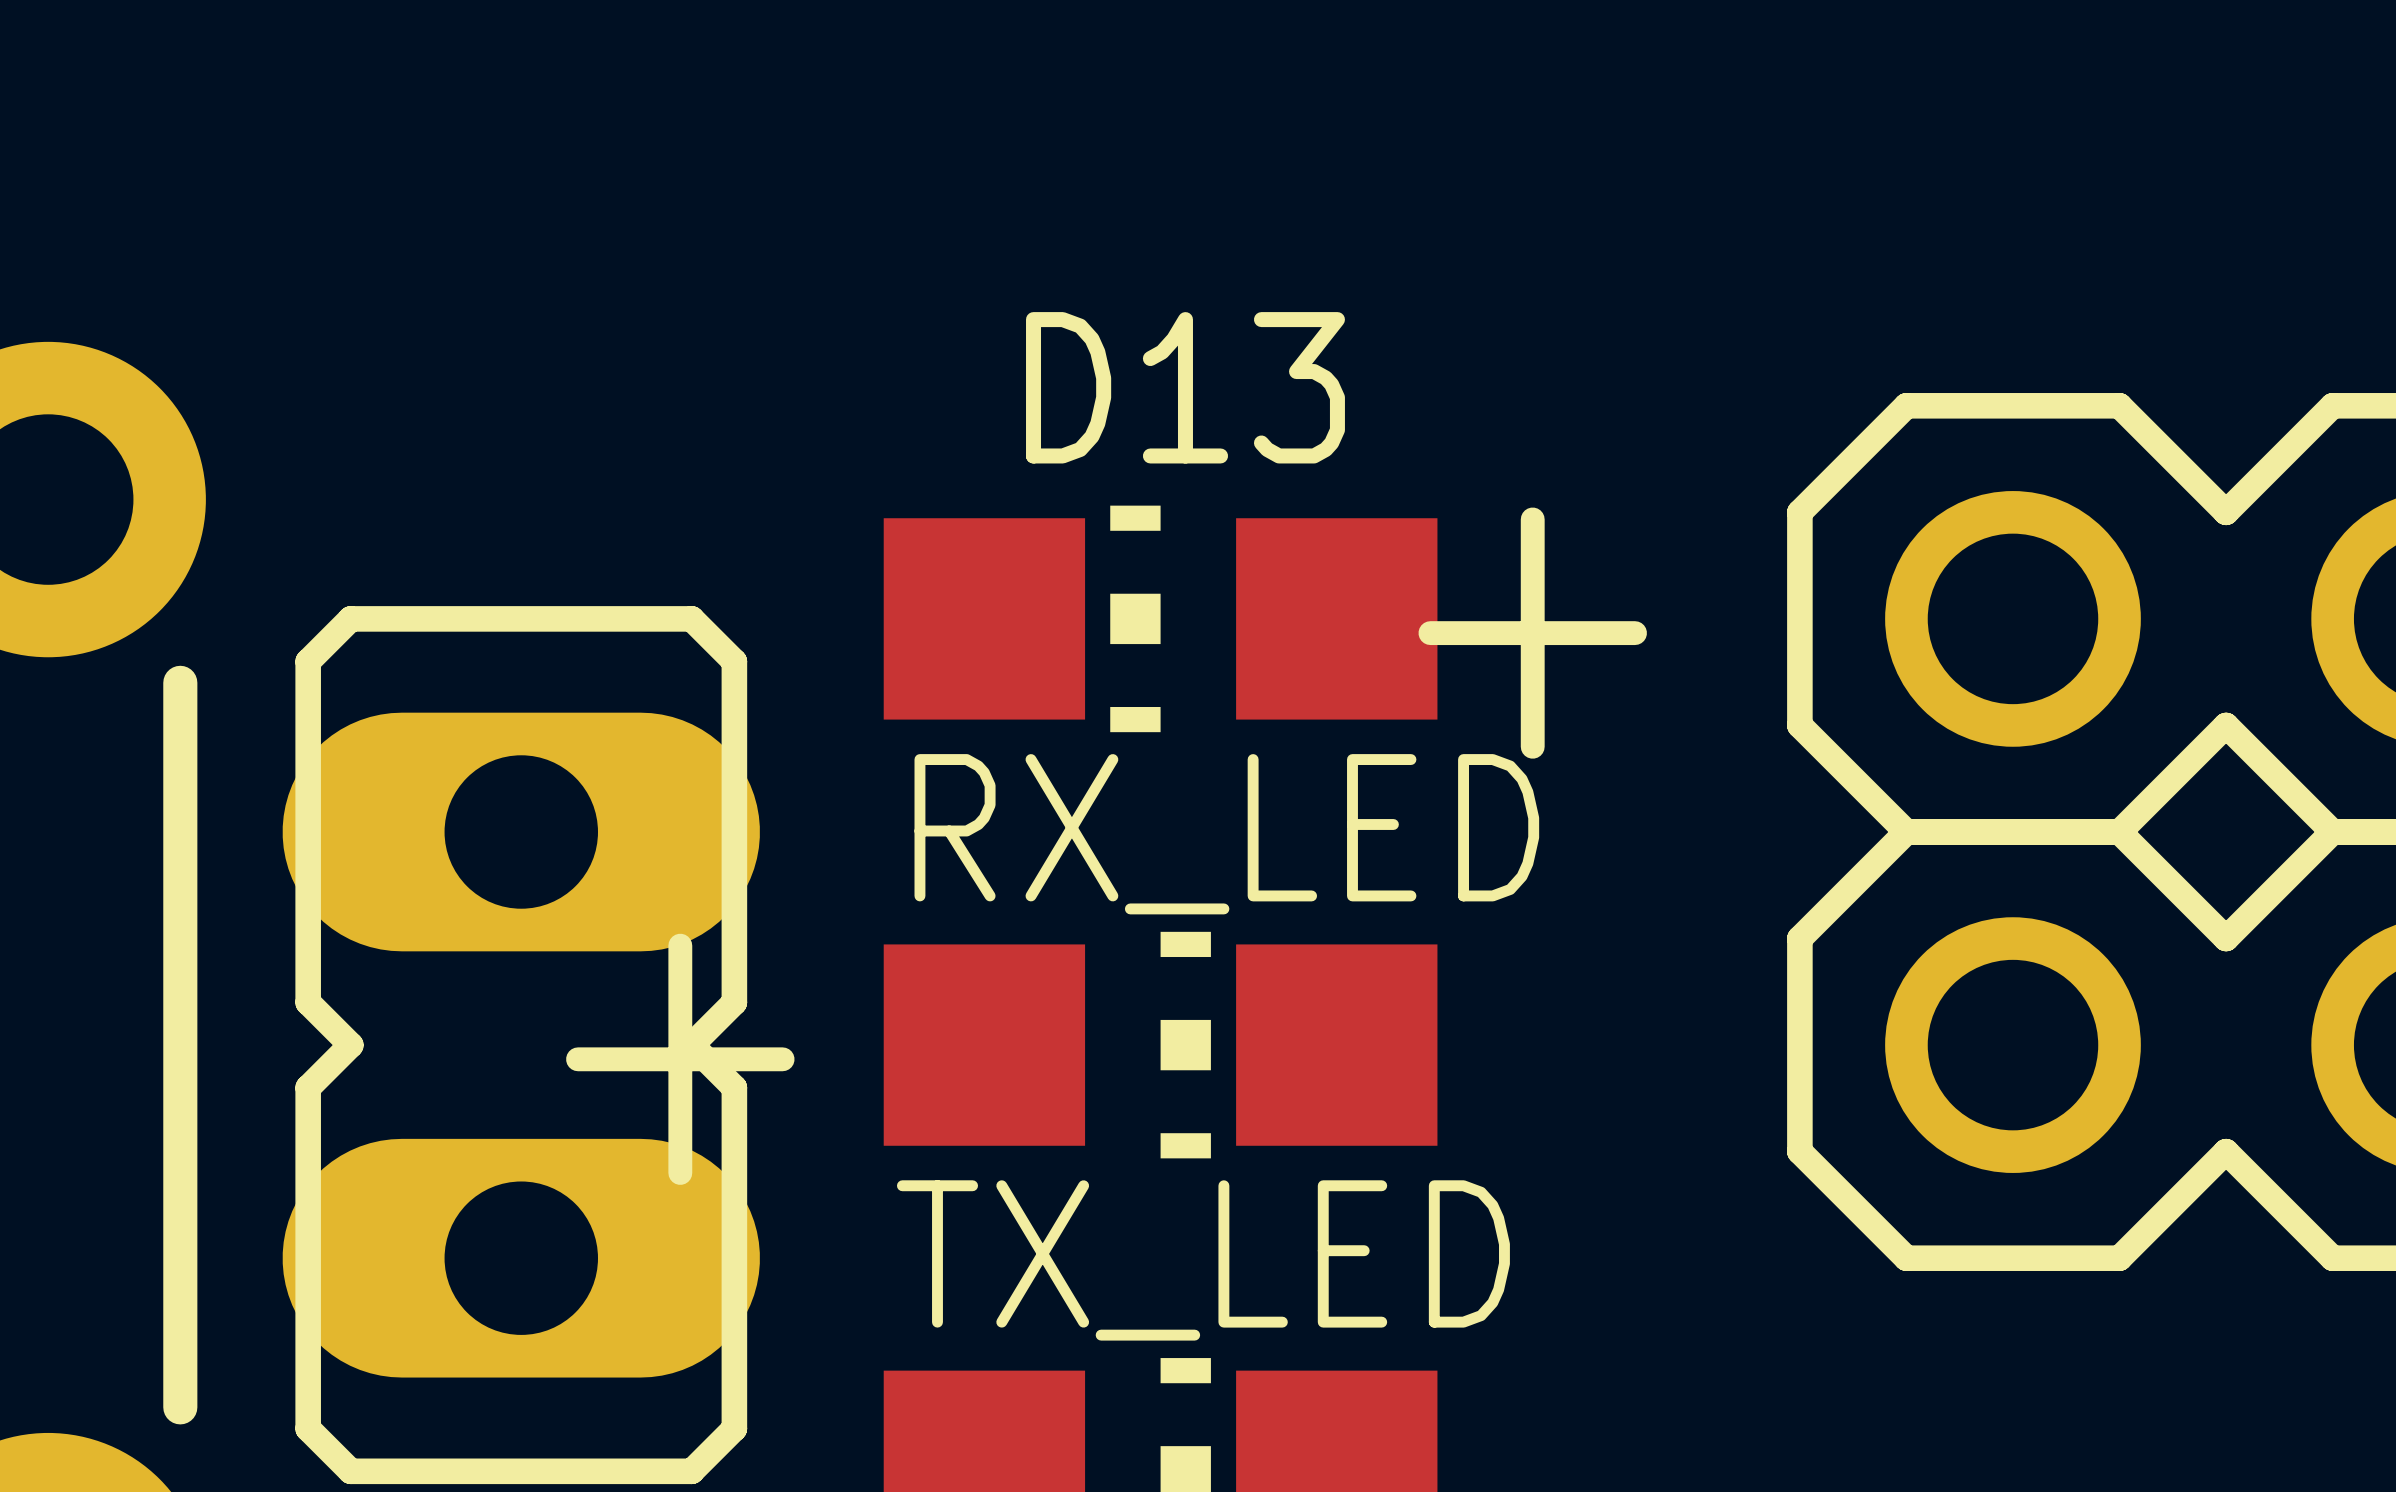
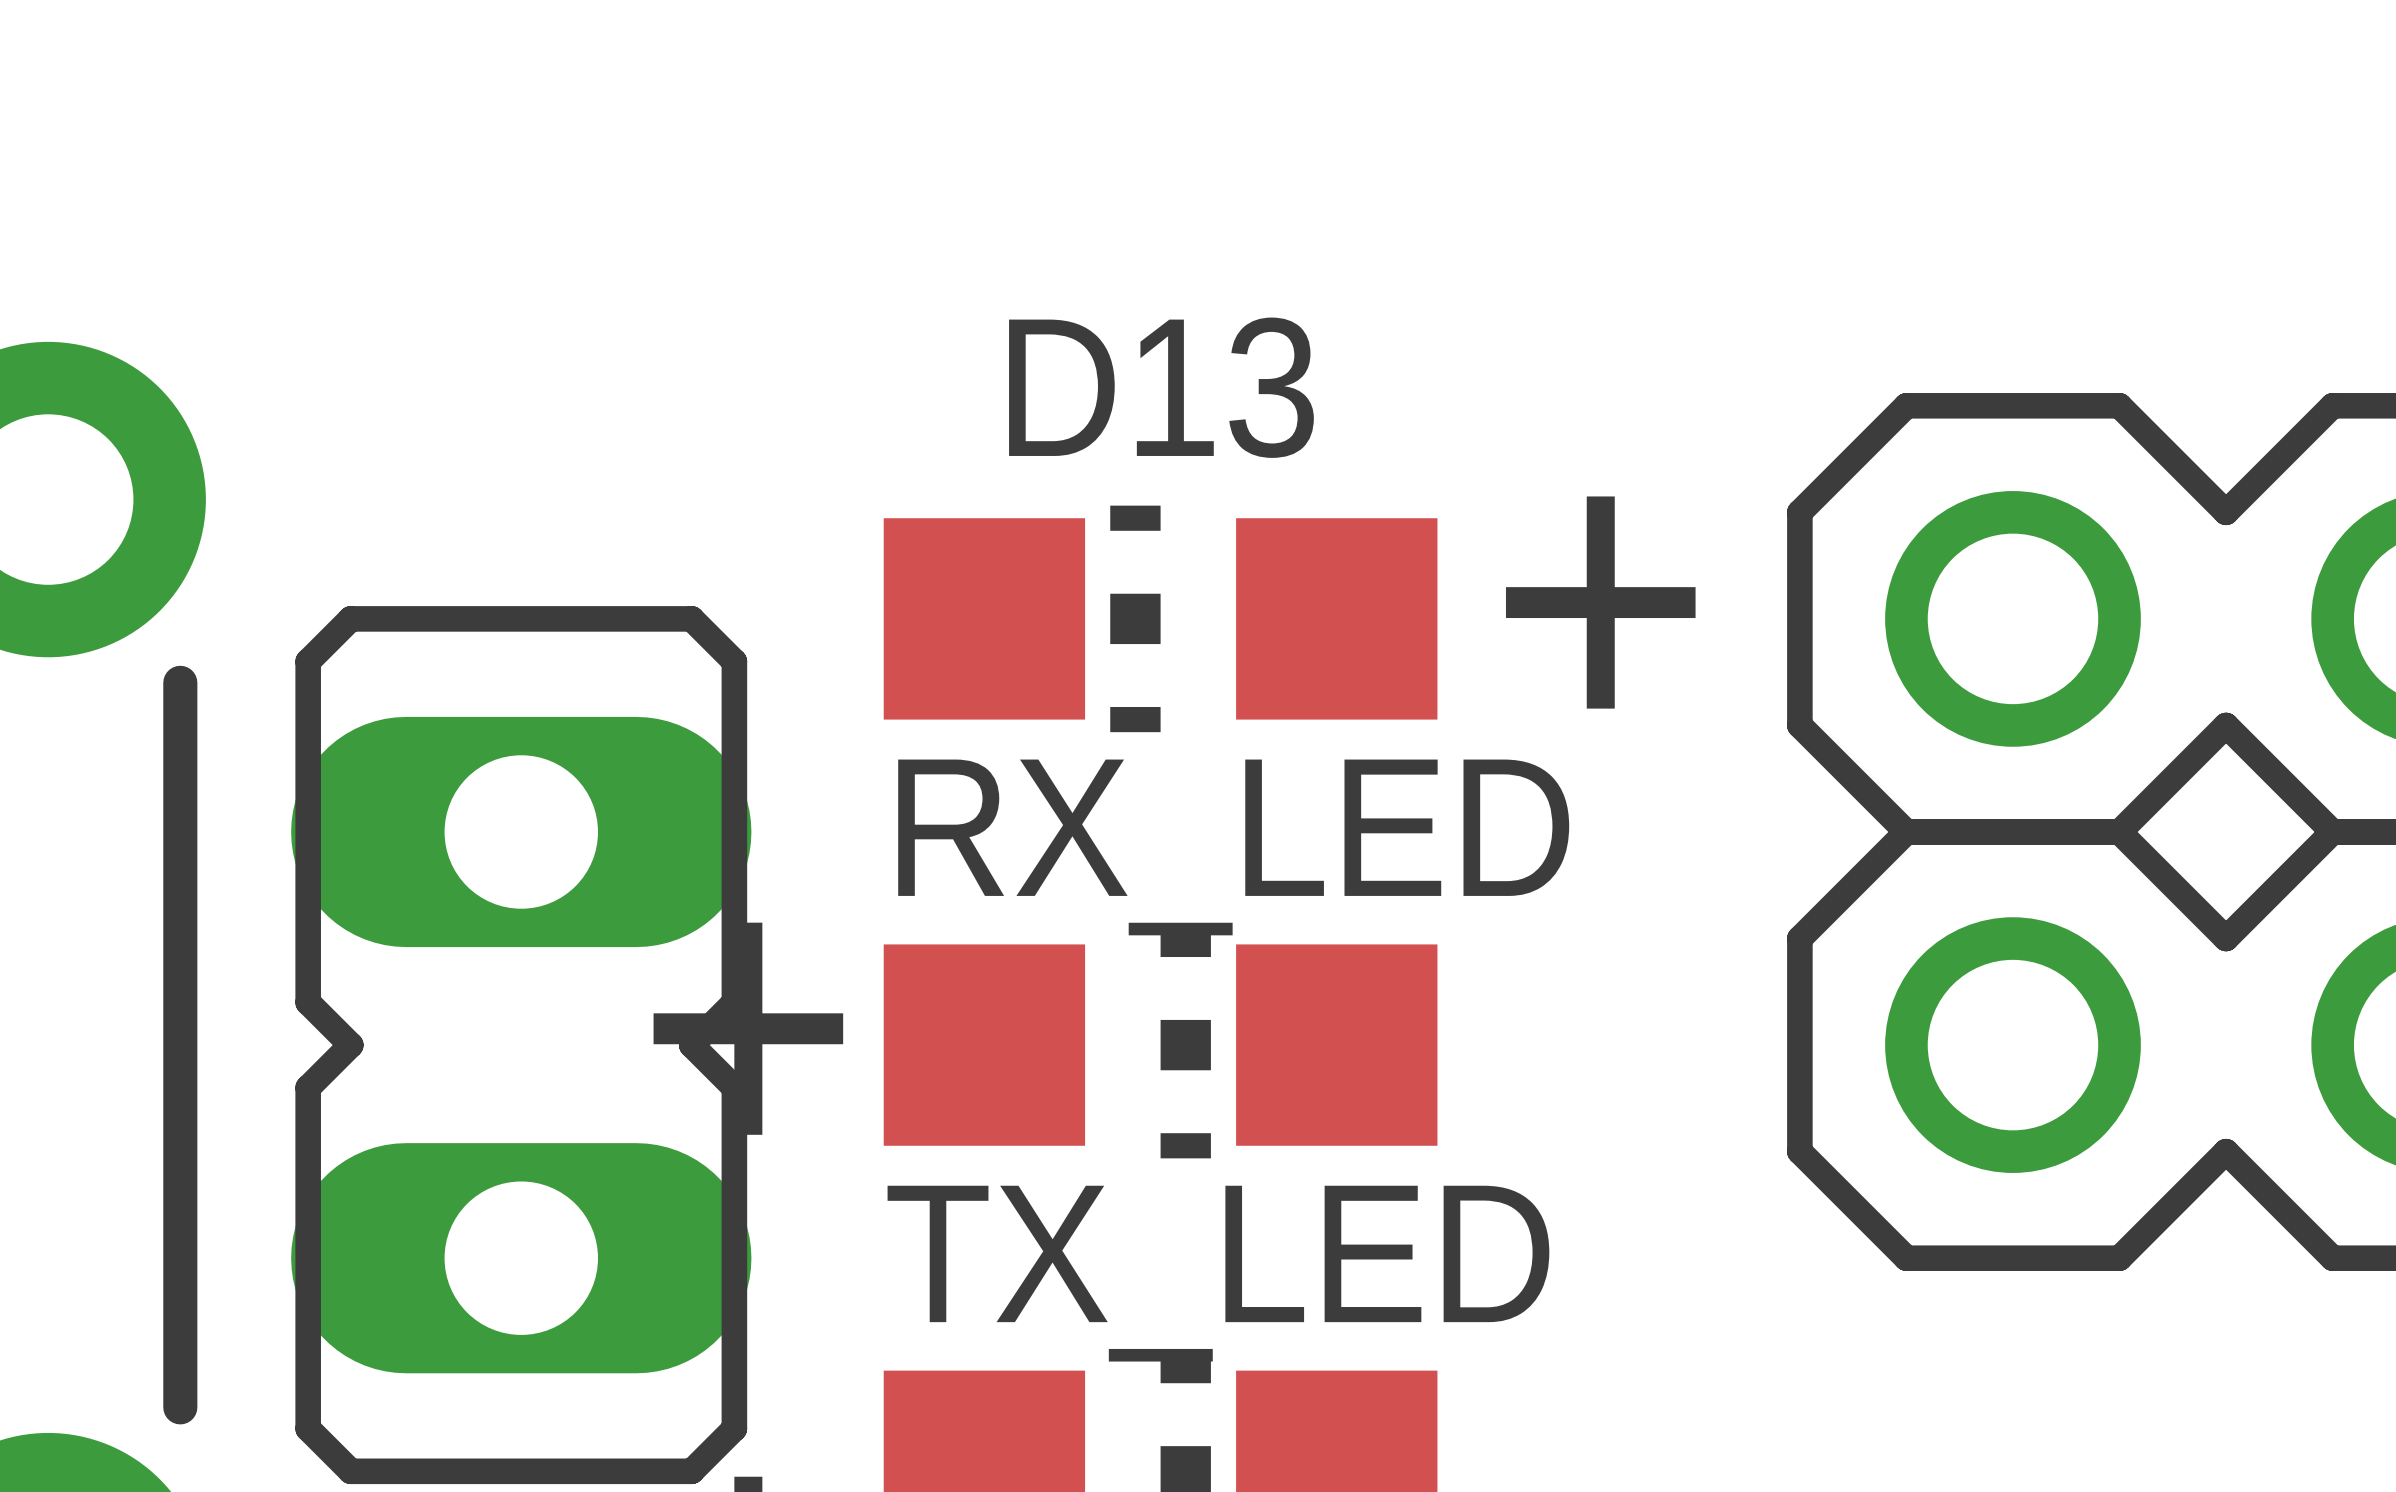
part footprint: [282, 606, 760, 1485] -> [291, 606, 752, 1485]

